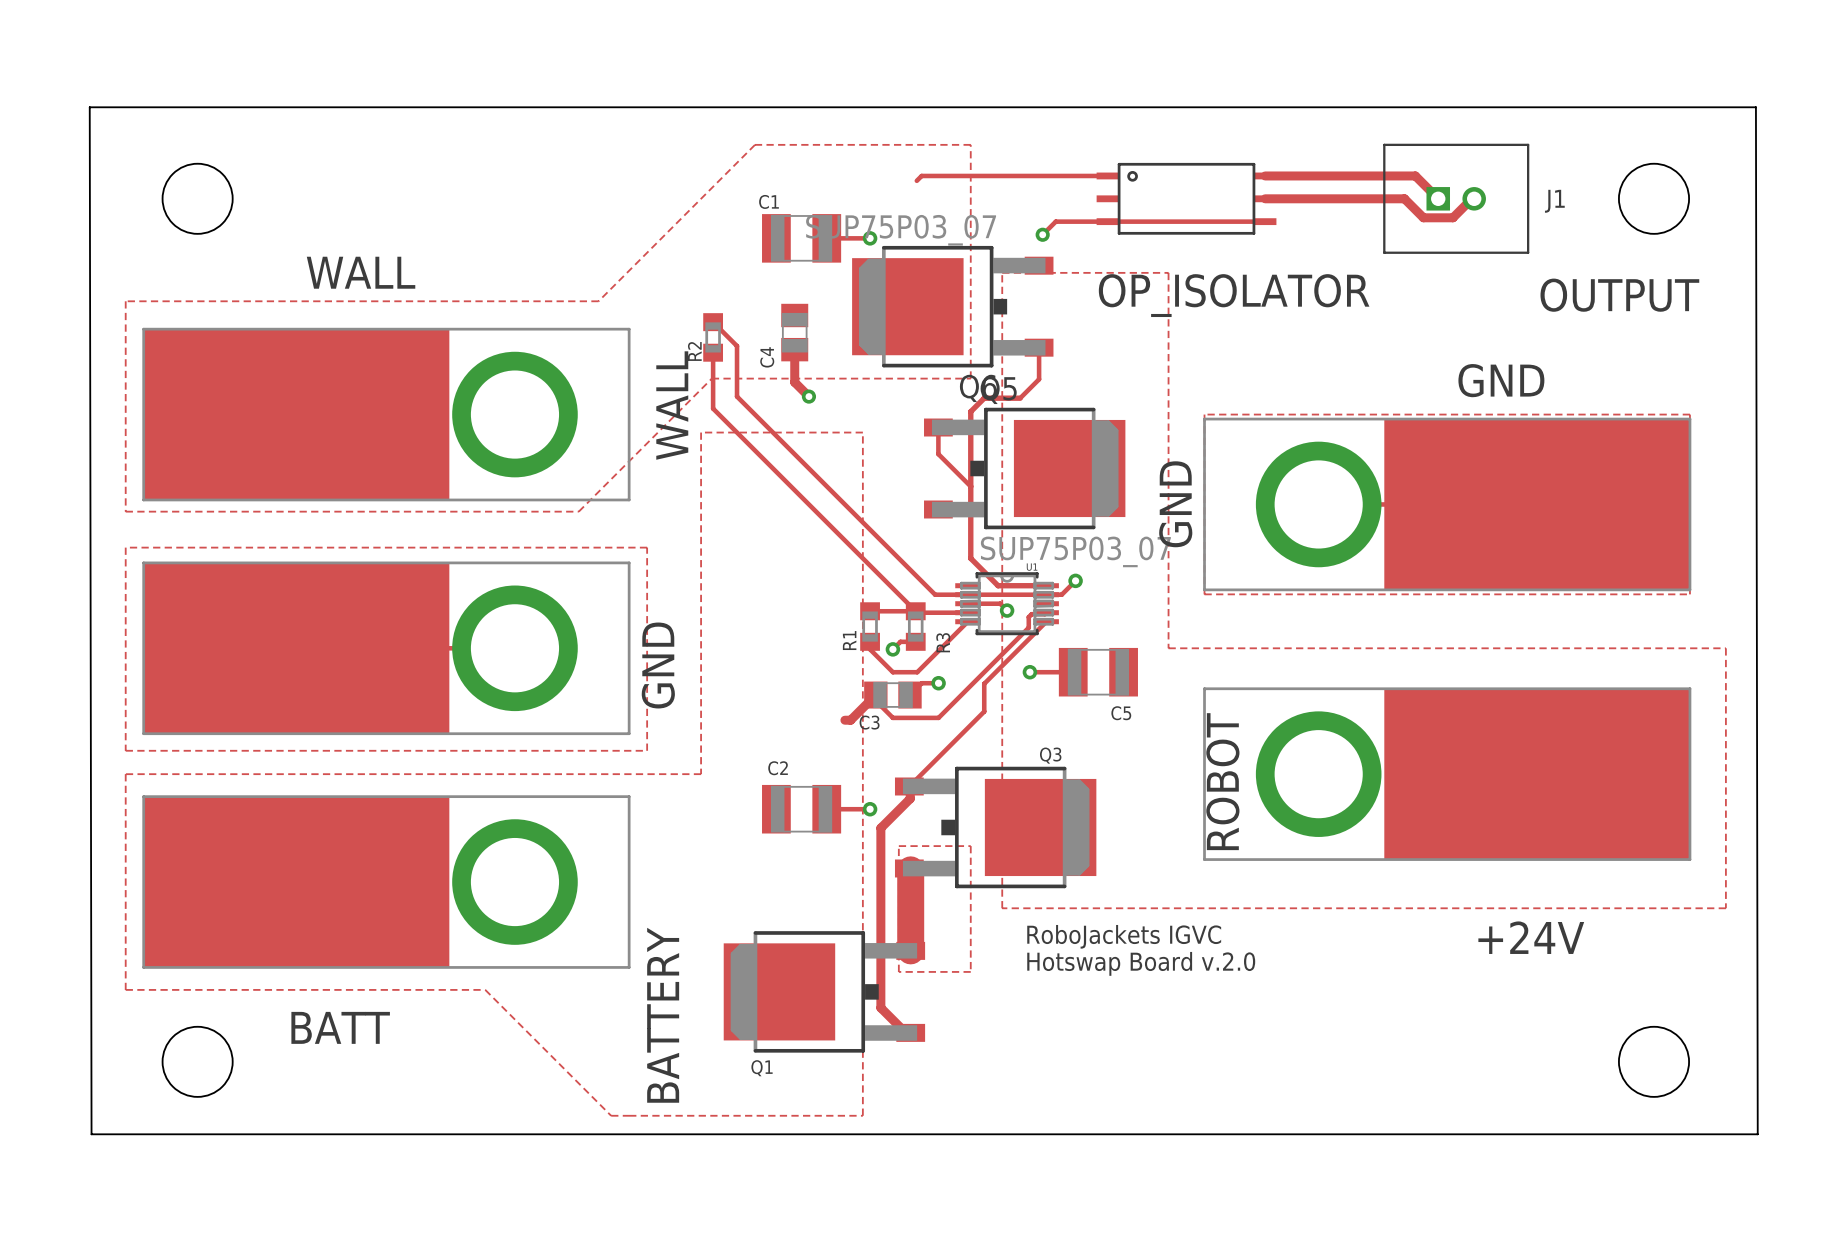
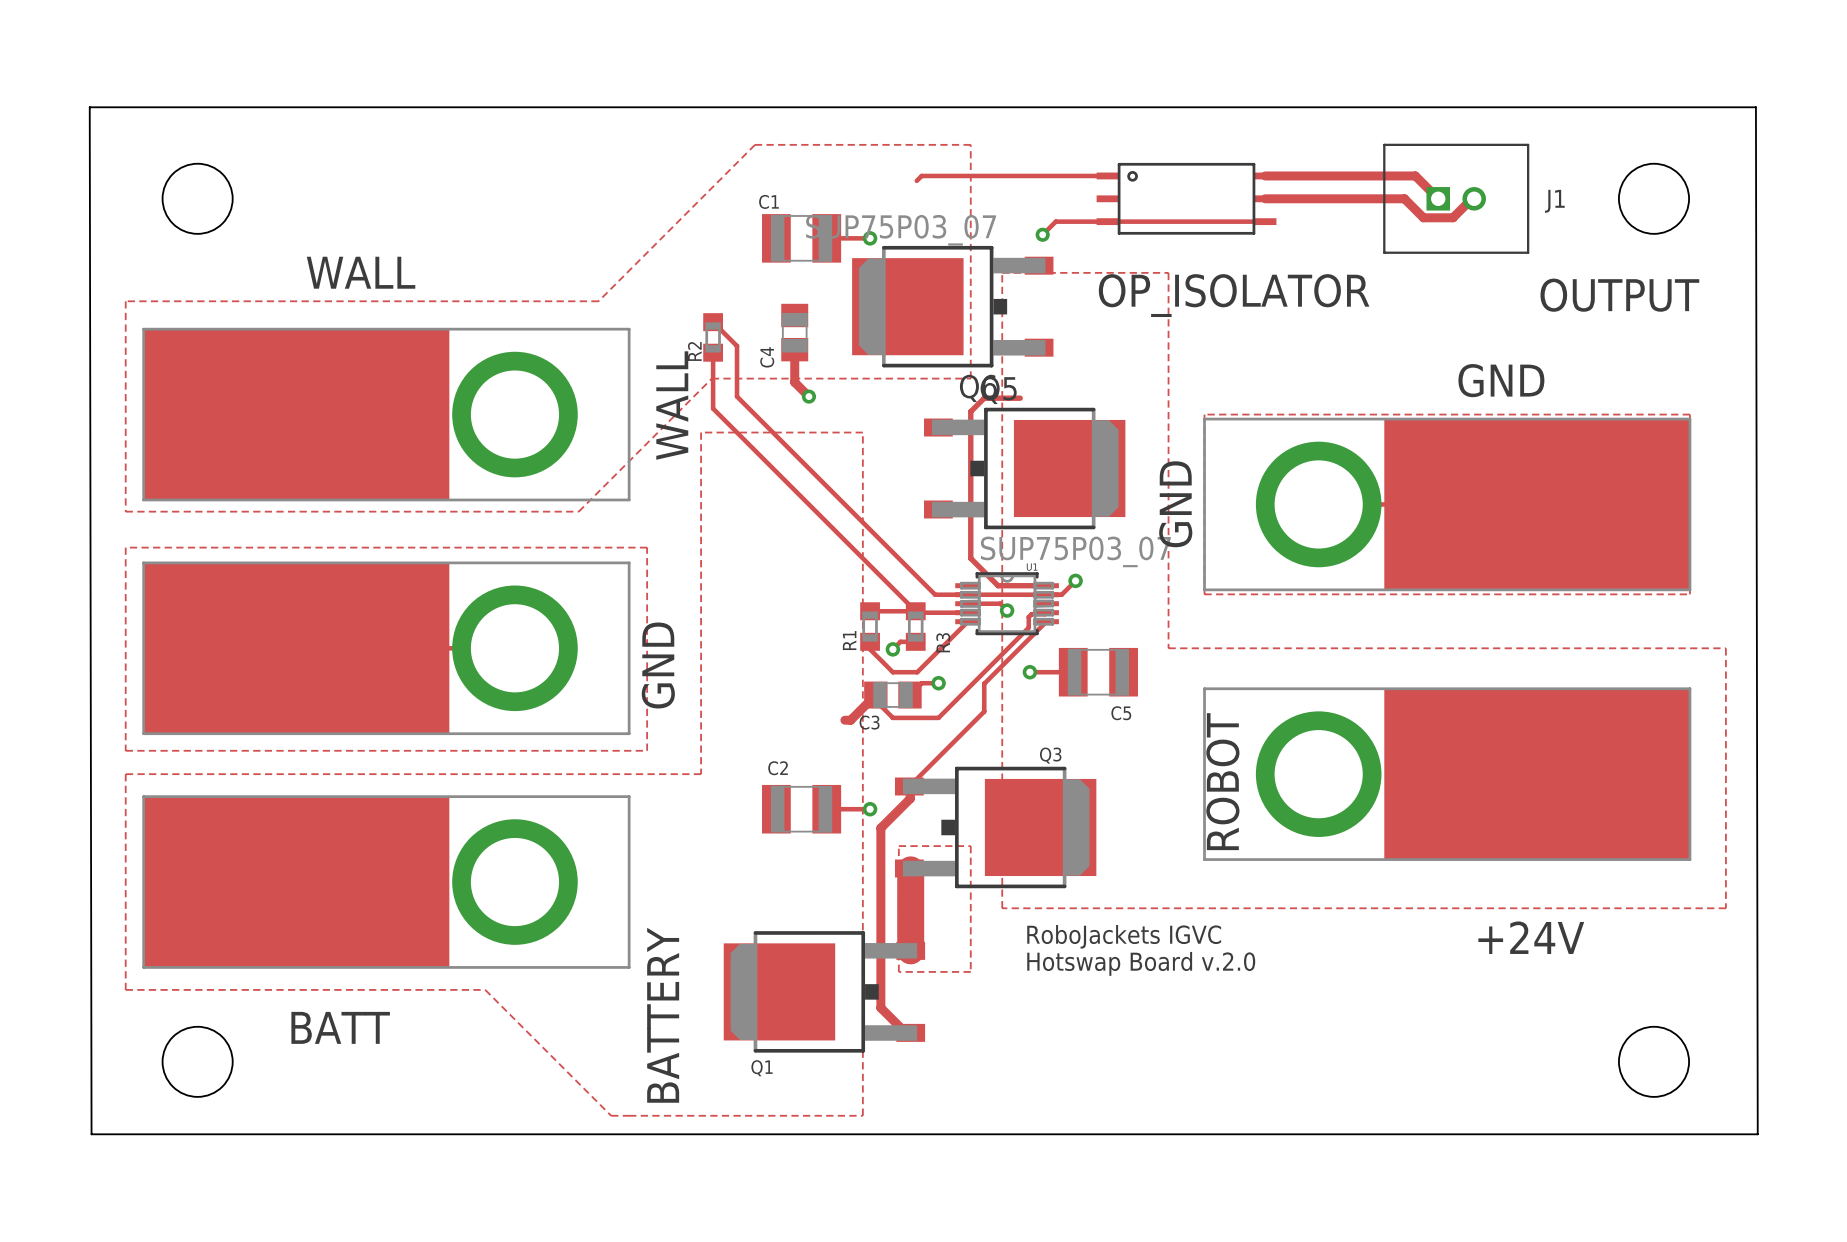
track: (1039, 347) (1039, 379) (1020, 398) -> none
track: (938, 427) (938, 454) (970, 486) -> none

